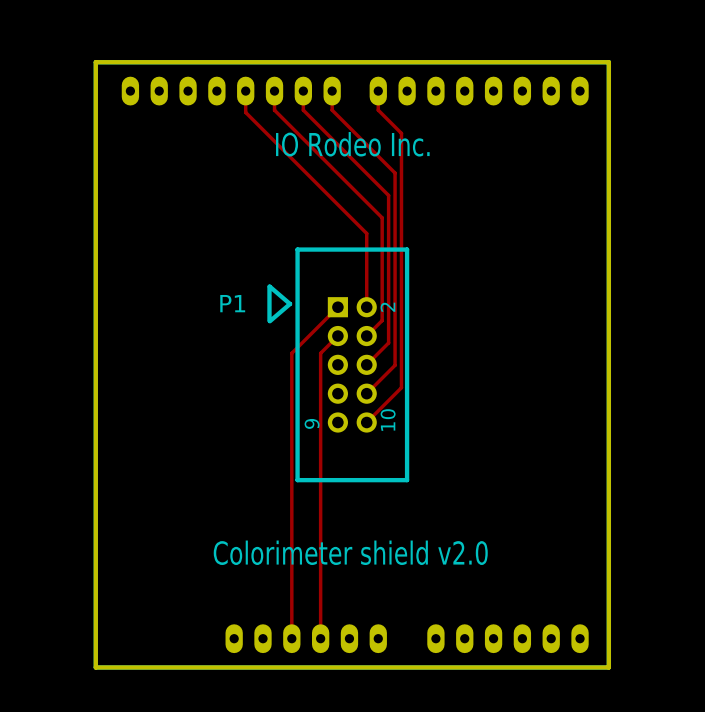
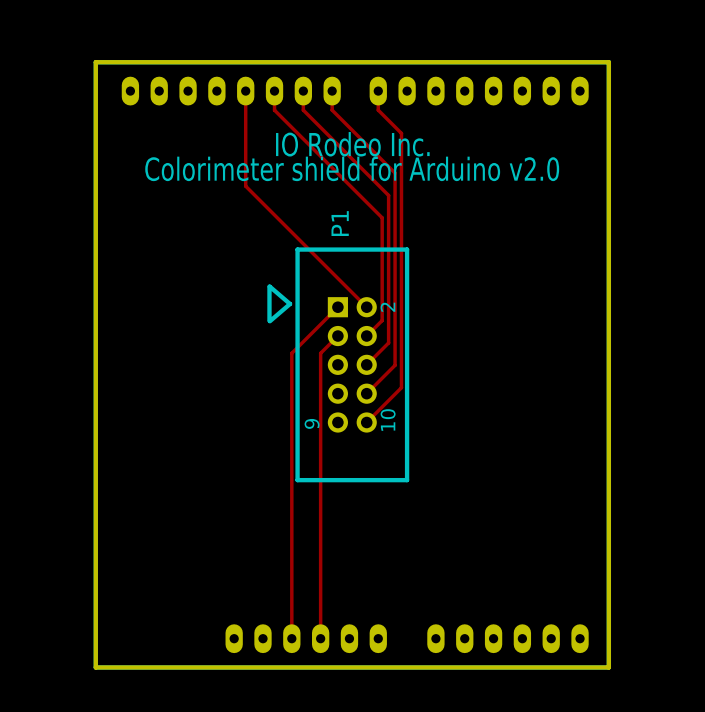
track: (245, 112) (366, 233) (366, 307) -> (245, 112) (245, 186) (366, 307)
text: none -> Colorimeter shield for Arduino v2.0 (352, 168)
P1 name rotation: 0° (232, 303) -> 90° counterclockwise (340, 223)
P1 name position: P1 (232, 303) -> P1 (340, 223)
text: Colorimeter shield v2.0 (350, 552) -> none

